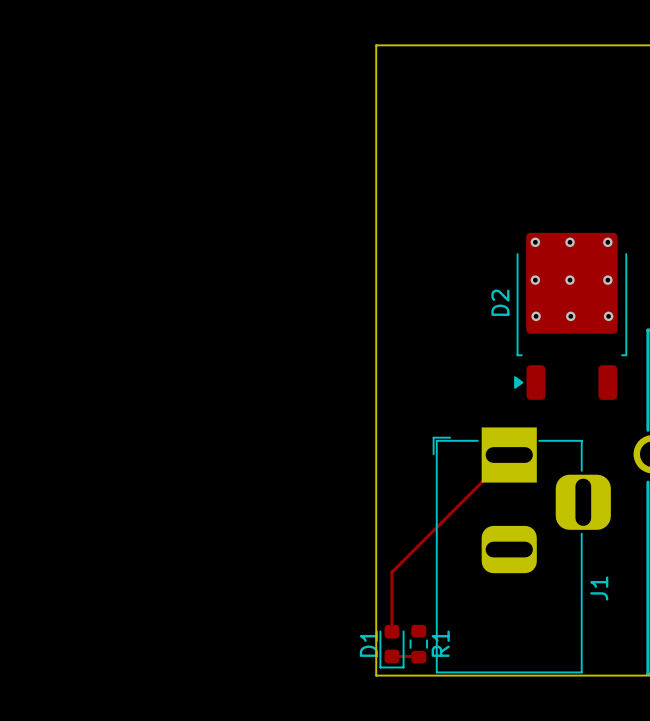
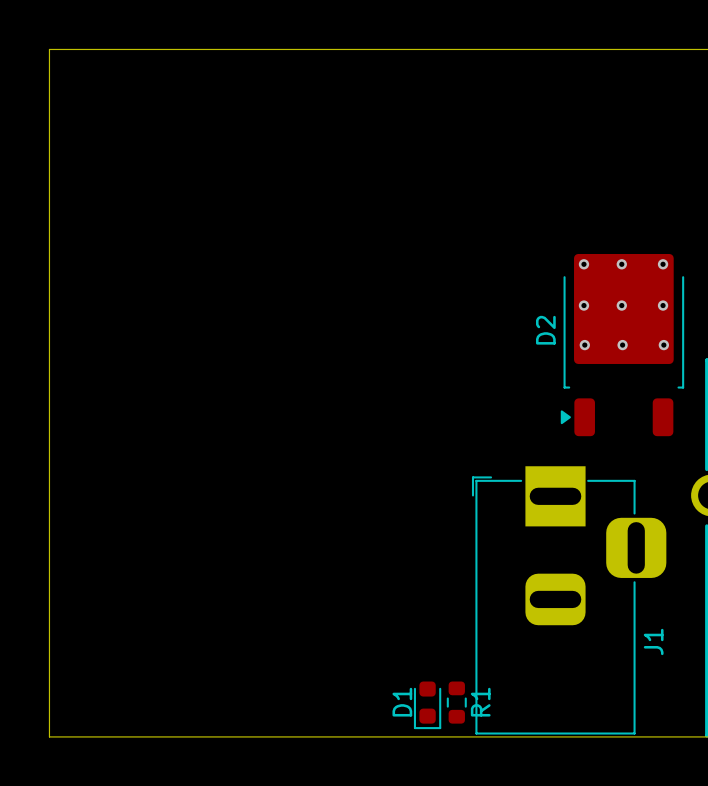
board edge: (376, 45) (376, 675) -> (410, 49) (49, 49) (49, 736) (410, 736)
track: (509, 455) (391, 572) (391, 631) -> none
track: (391, 656) (418, 657) -> none

